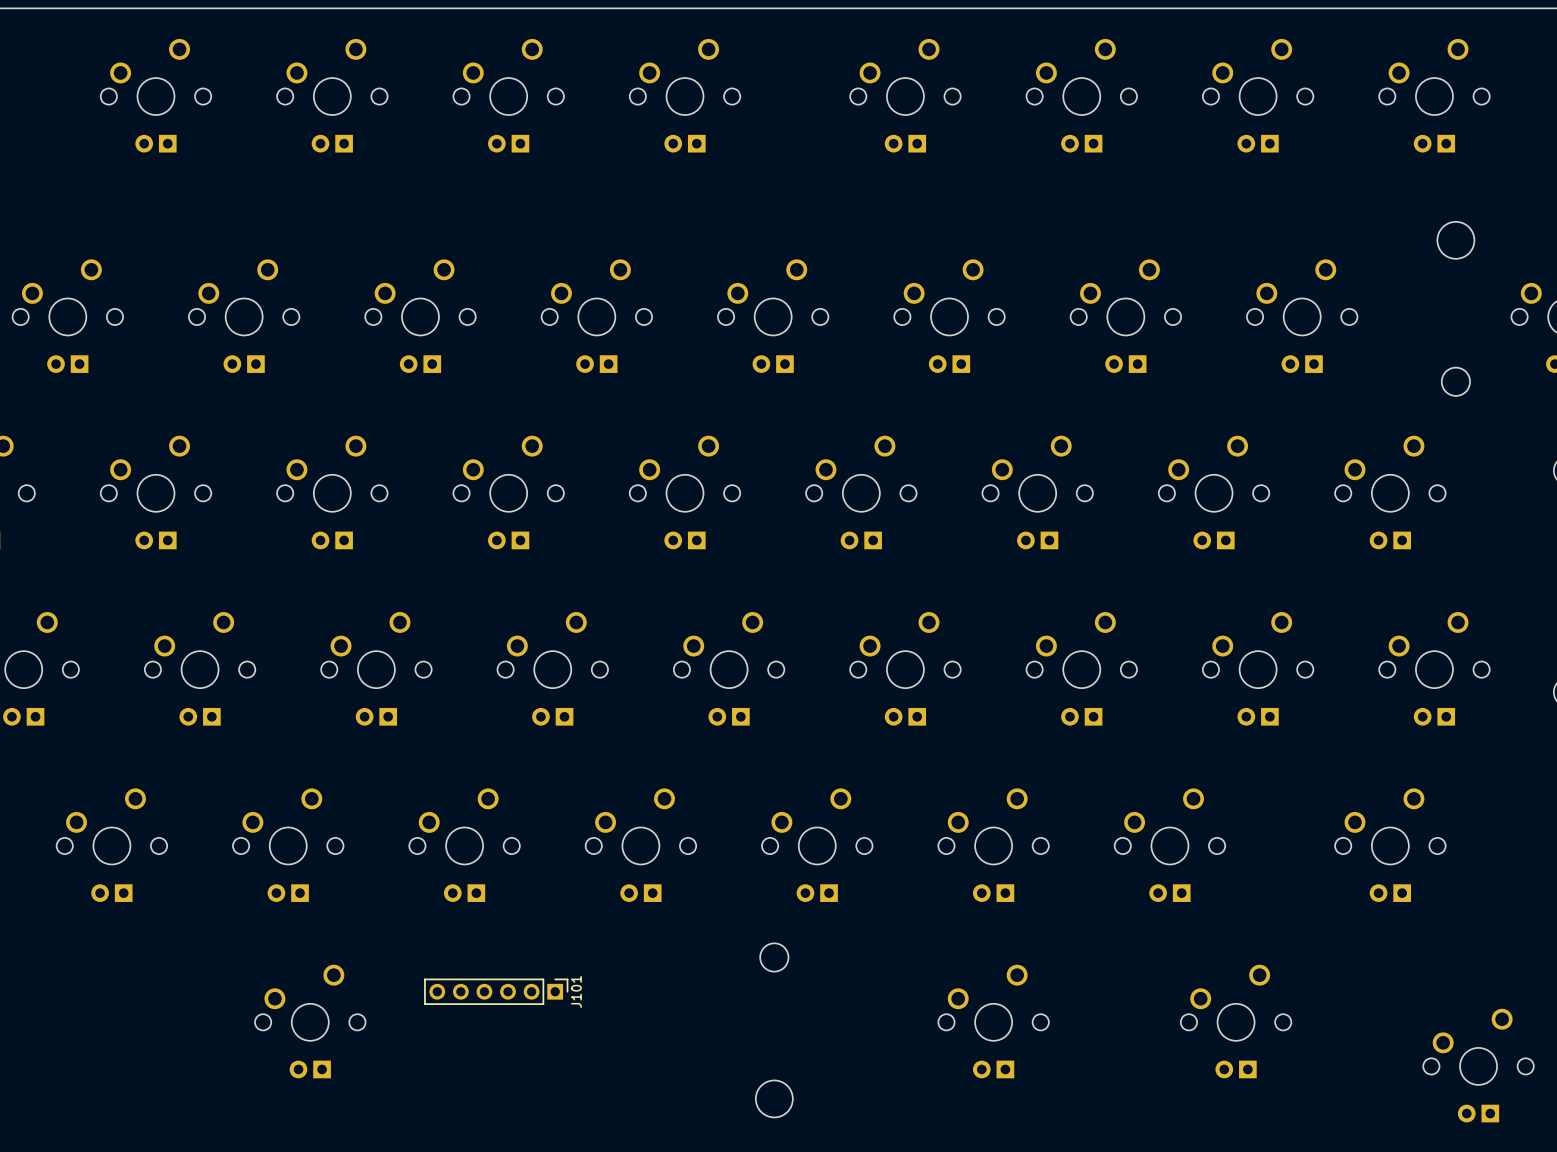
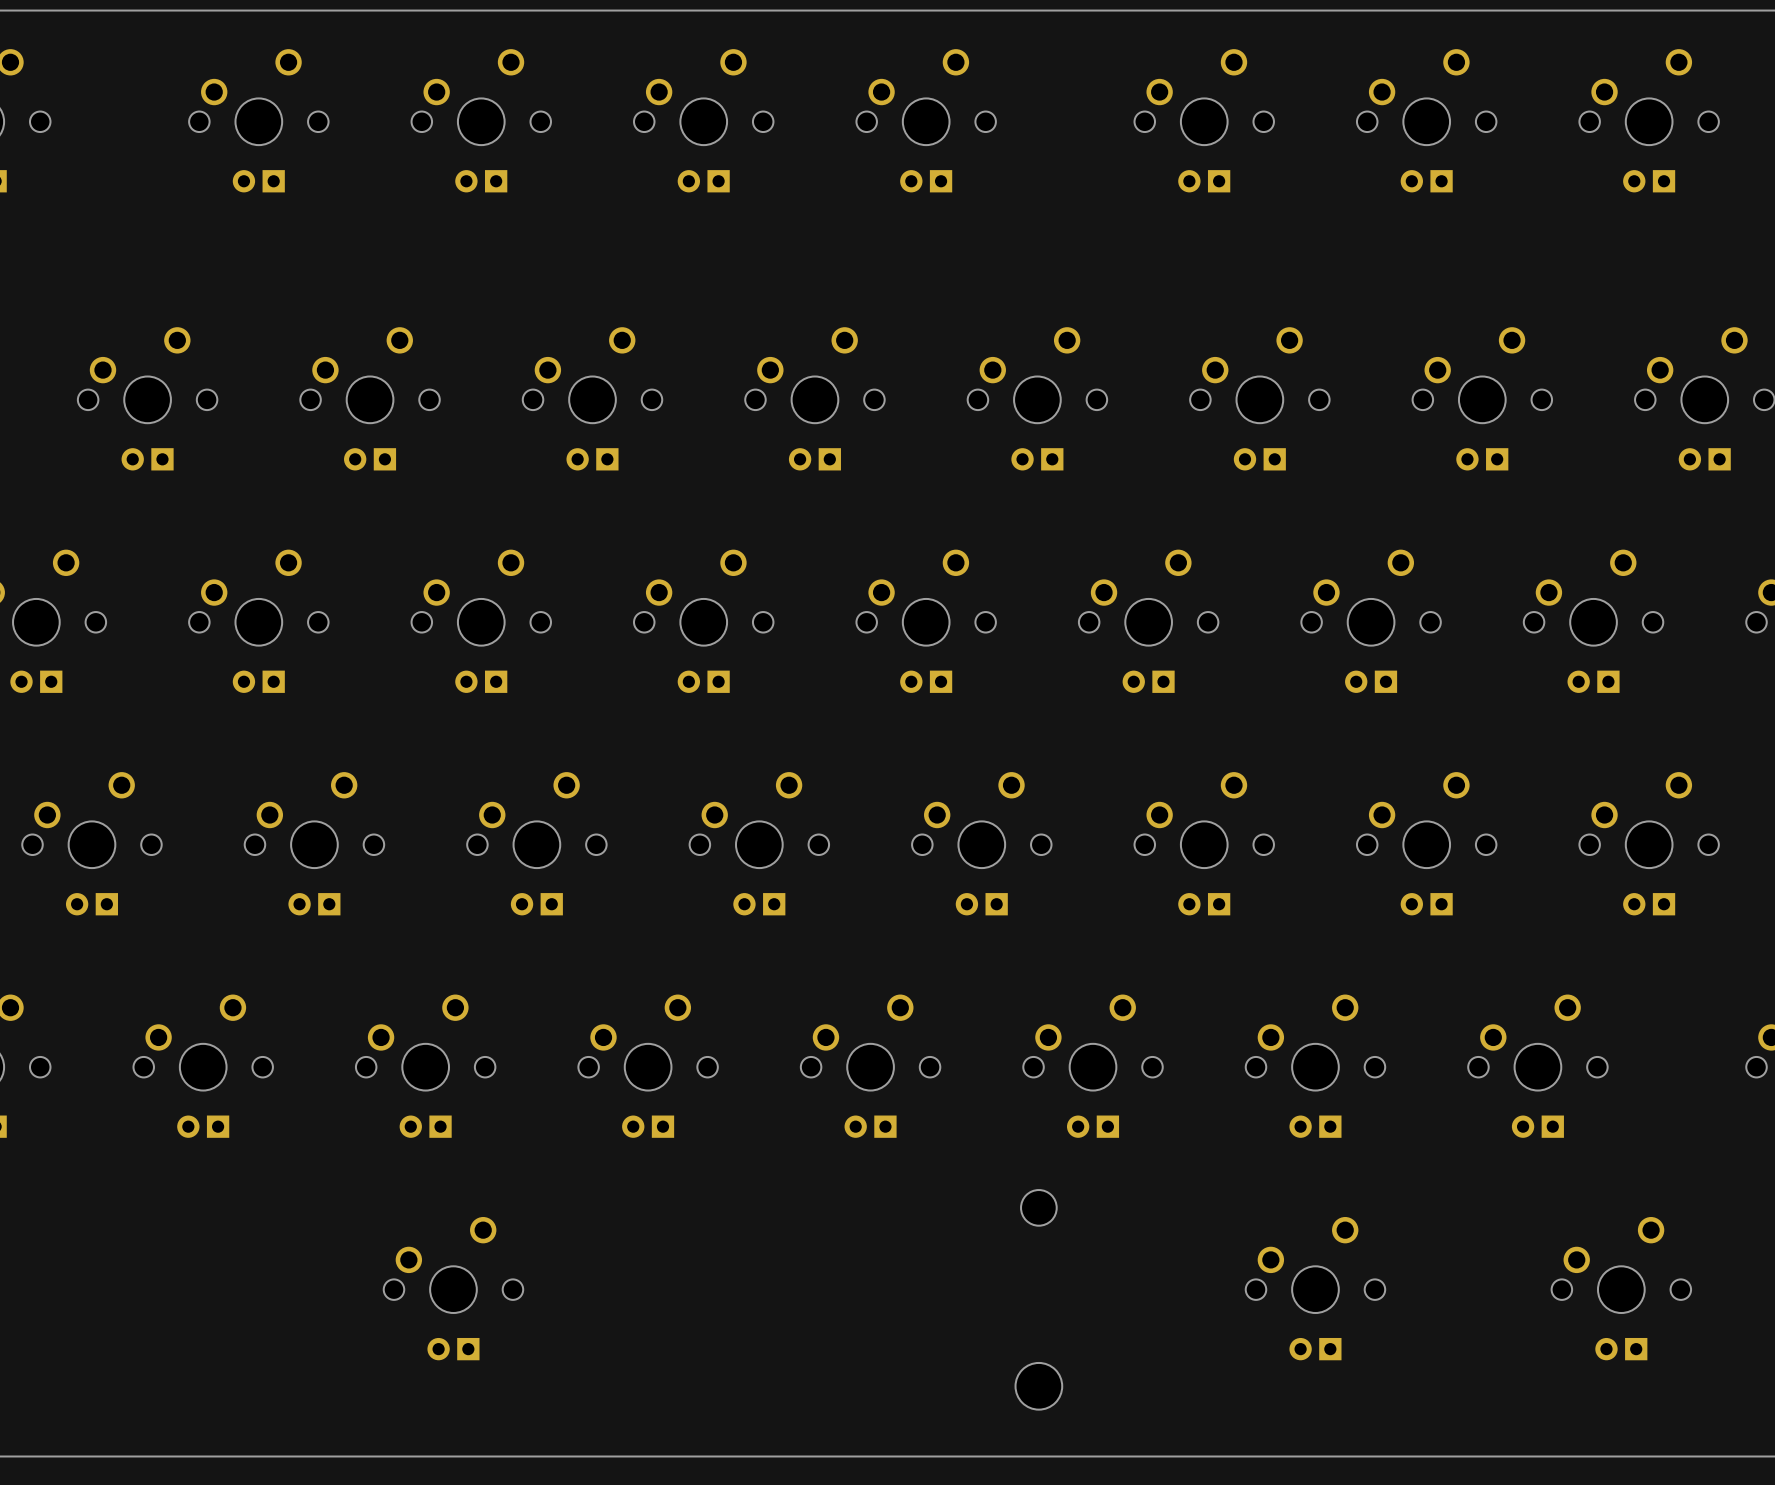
J101: (496, 991) -> none

